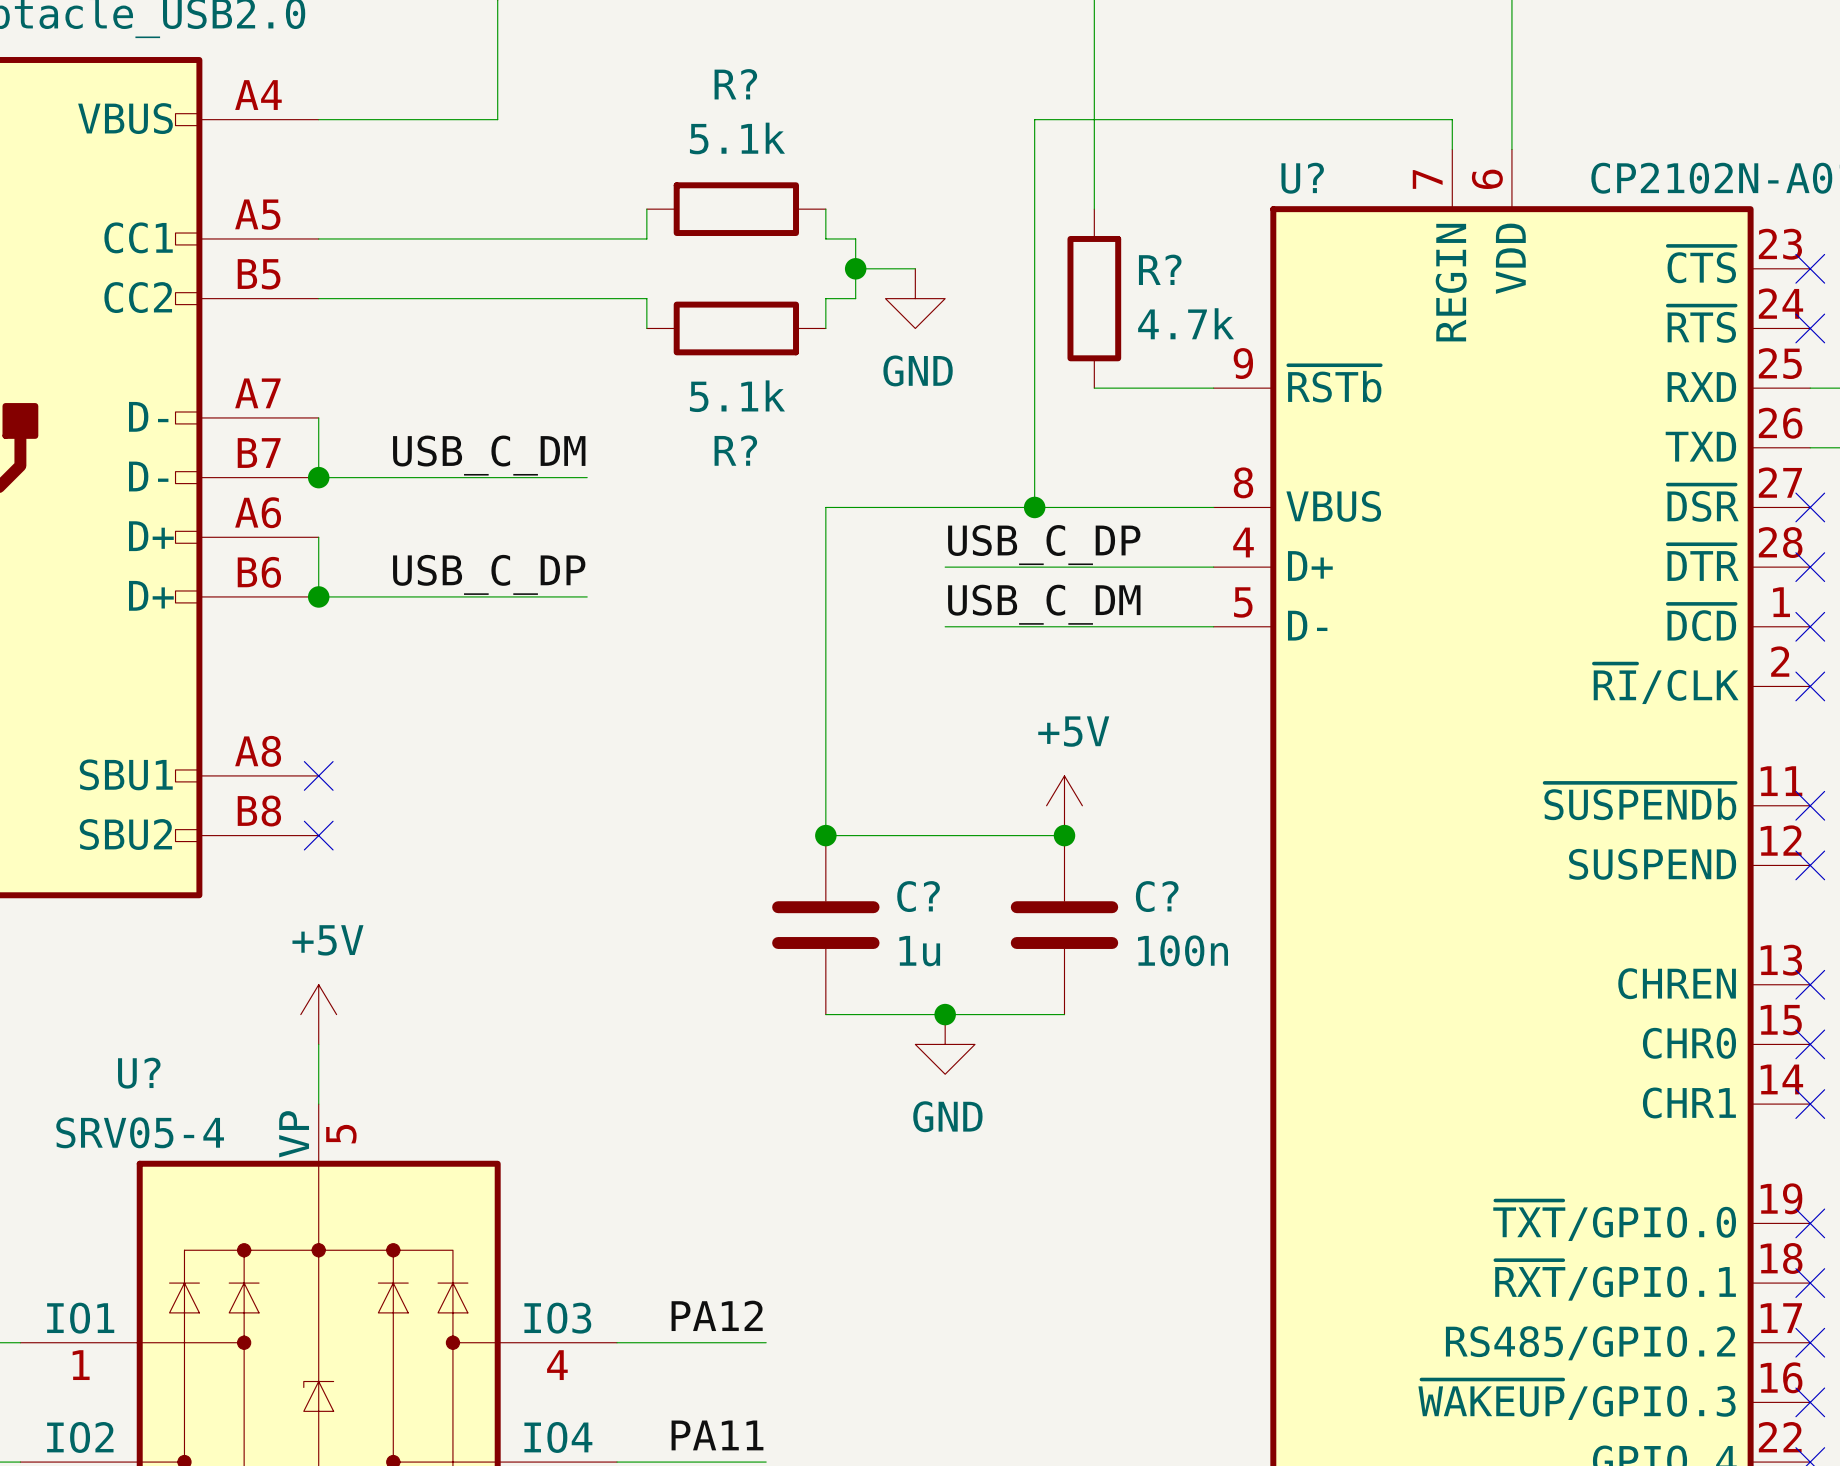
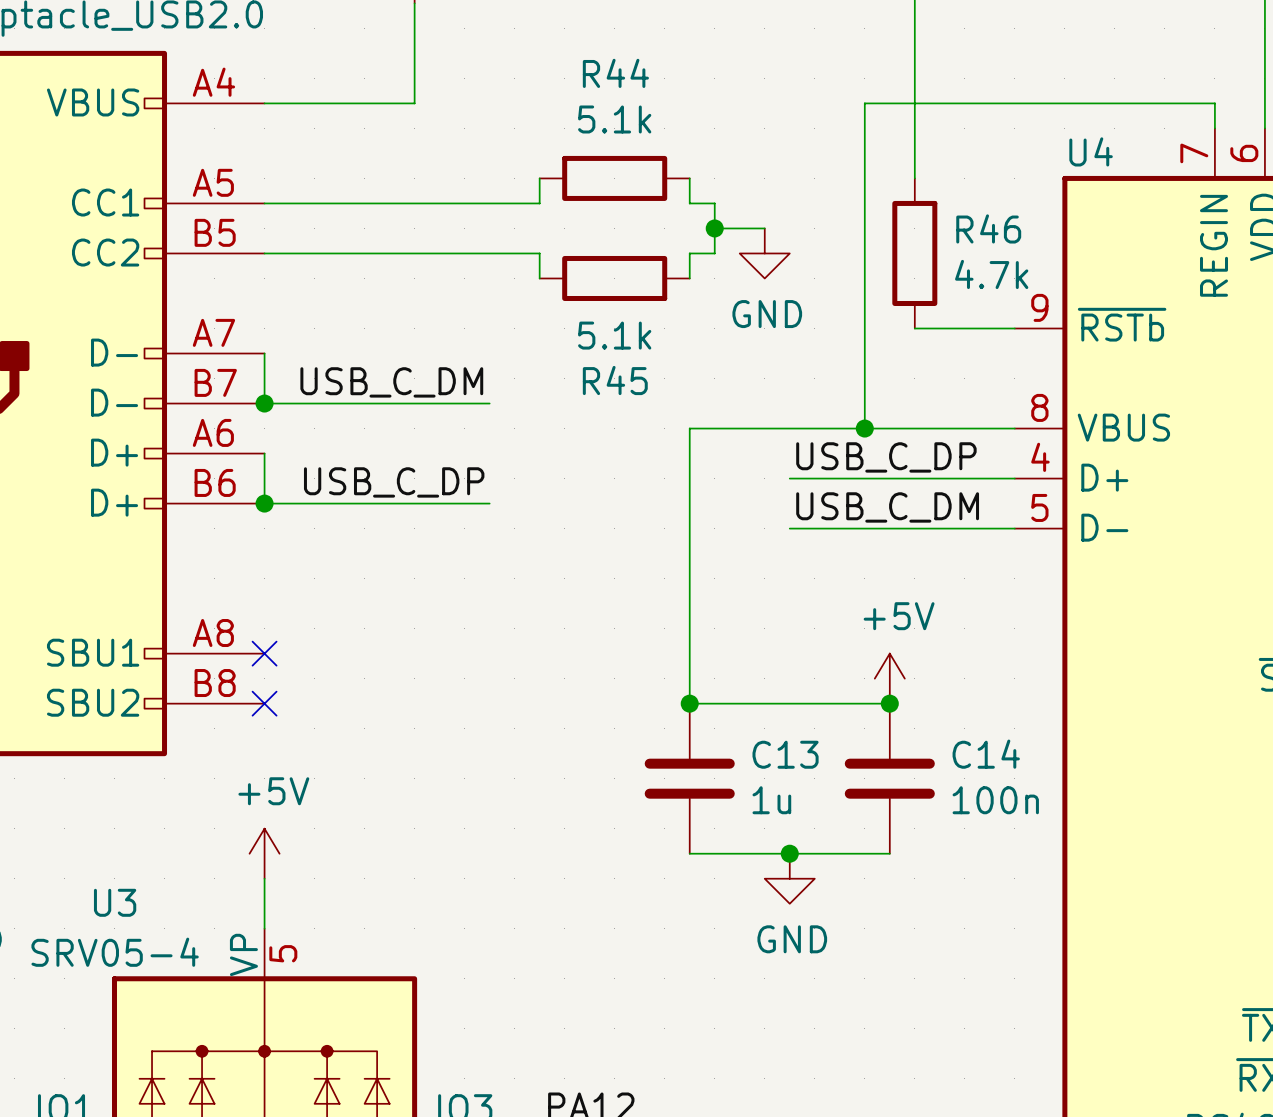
R? name: R? (735, 84) -> R44 (615, 73)
U? name: U? (1302, 178) -> U4 (1091, 151)
R? name: R? (1160, 269) -> R46 (988, 228)
R? name: R? (735, 450) -> R45 (615, 380)
C? name: C? (918, 896) -> C13 (785, 754)
C? name: C? (1157, 896) -> C14 (986, 754)
U? name: U? (139, 1073) -> U3 (115, 902)

